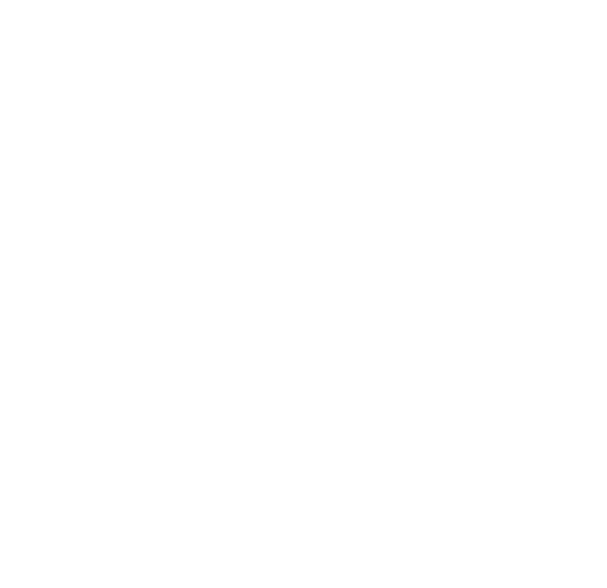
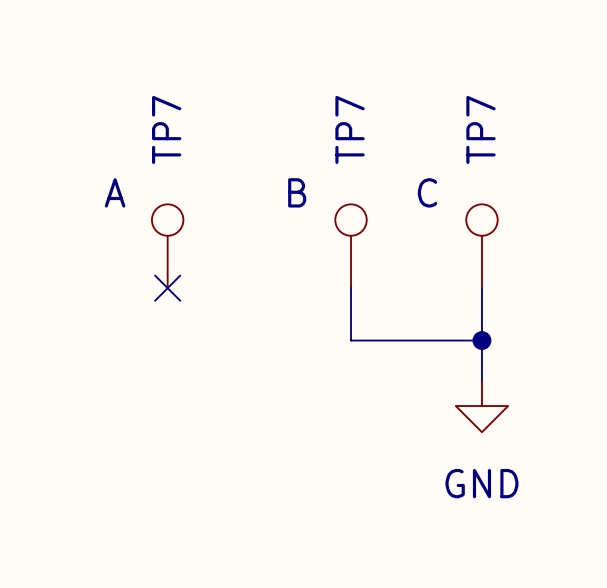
TP7: none -> A (167, 246)
TP7: none -> B (351, 246)
TP7: none -> C (481, 246)
no-connect mark: none -> (167, 288)
wire: none -> (351, 288) (351, 340) (481, 340)
wire: none -> (481, 288) (481, 379)
junction: none -> (481, 340)
power symbol: none -> GND (481, 406)

